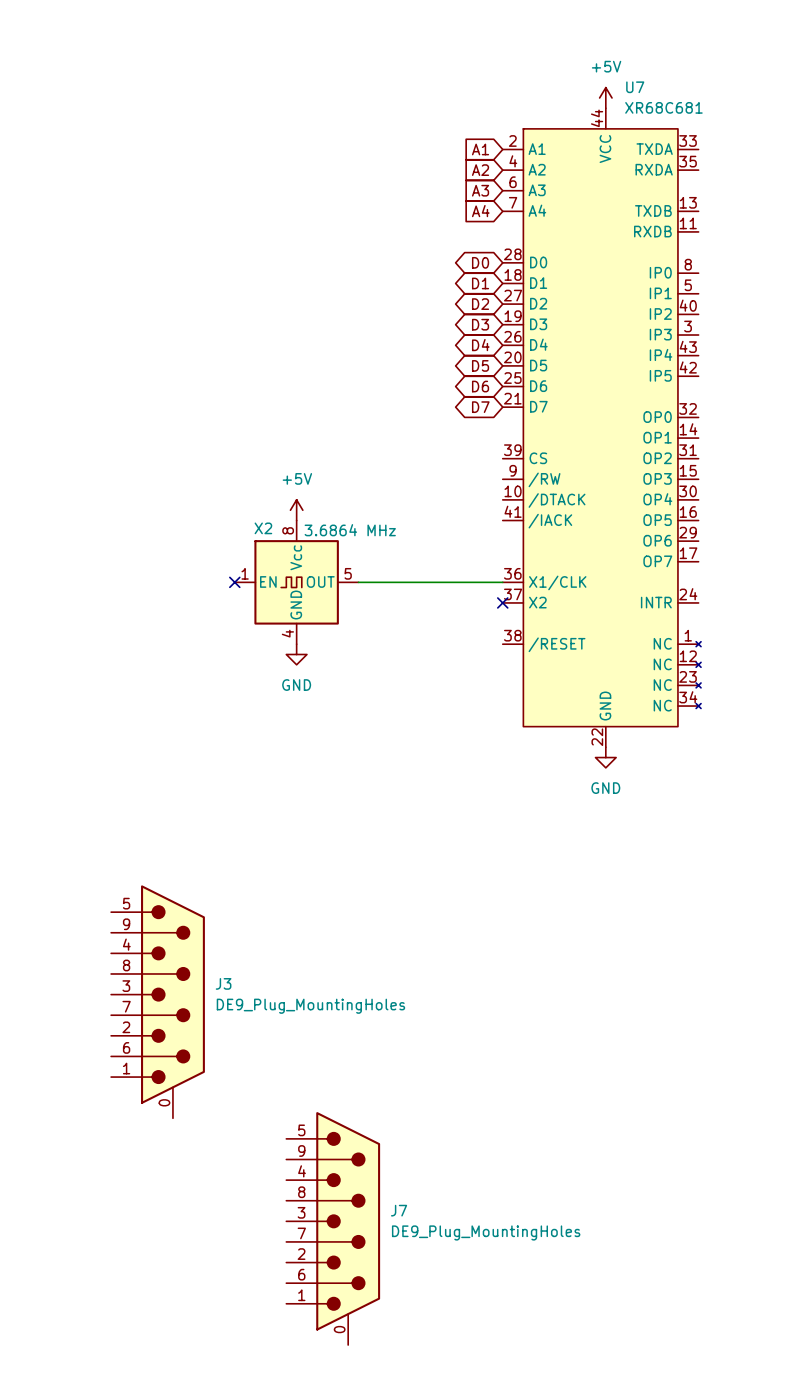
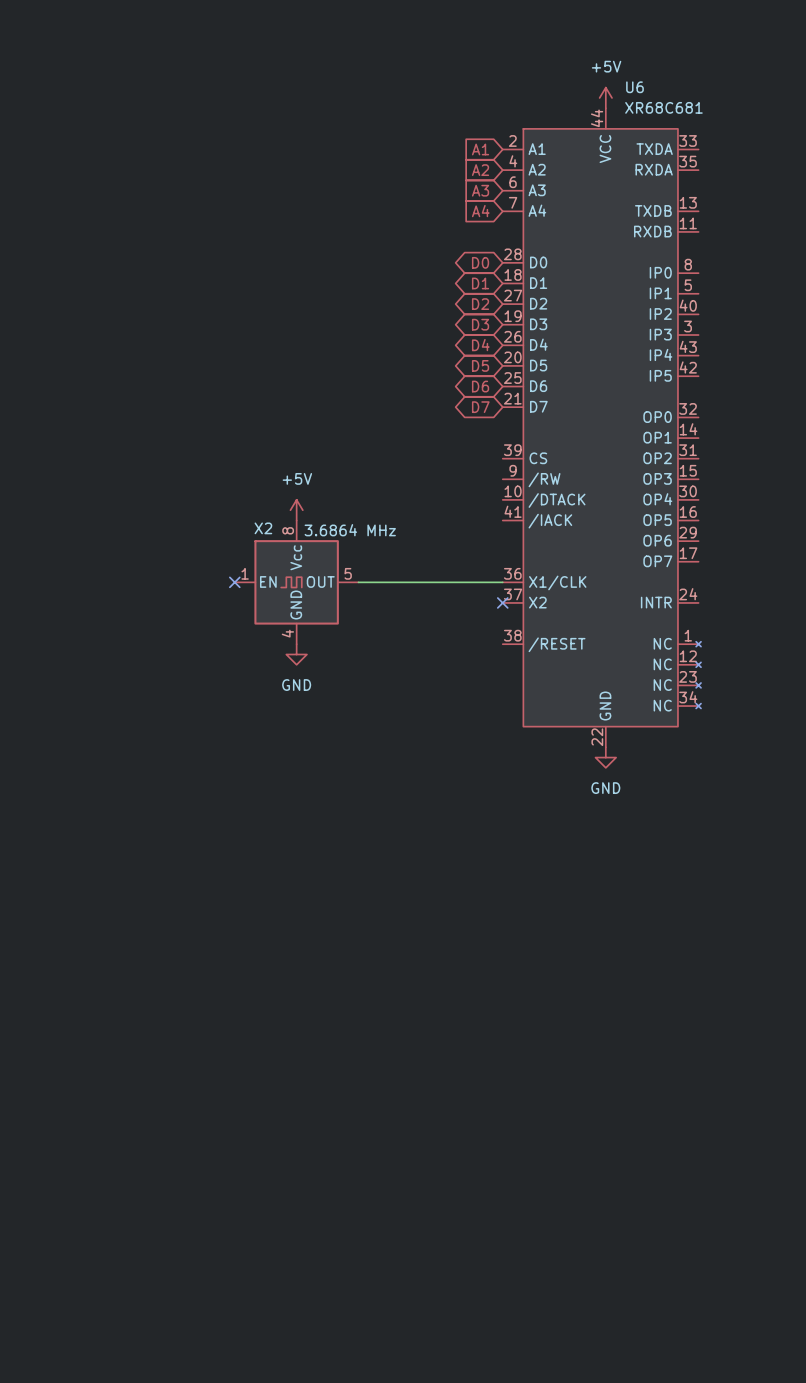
U7 name: U7 (635, 87) -> U6 (634, 87)
J3: DE9_Plug_MountingHoles (158, 1001) -> none
J7: DE9_Plug_MountingHoles (333, 1228) -> none

